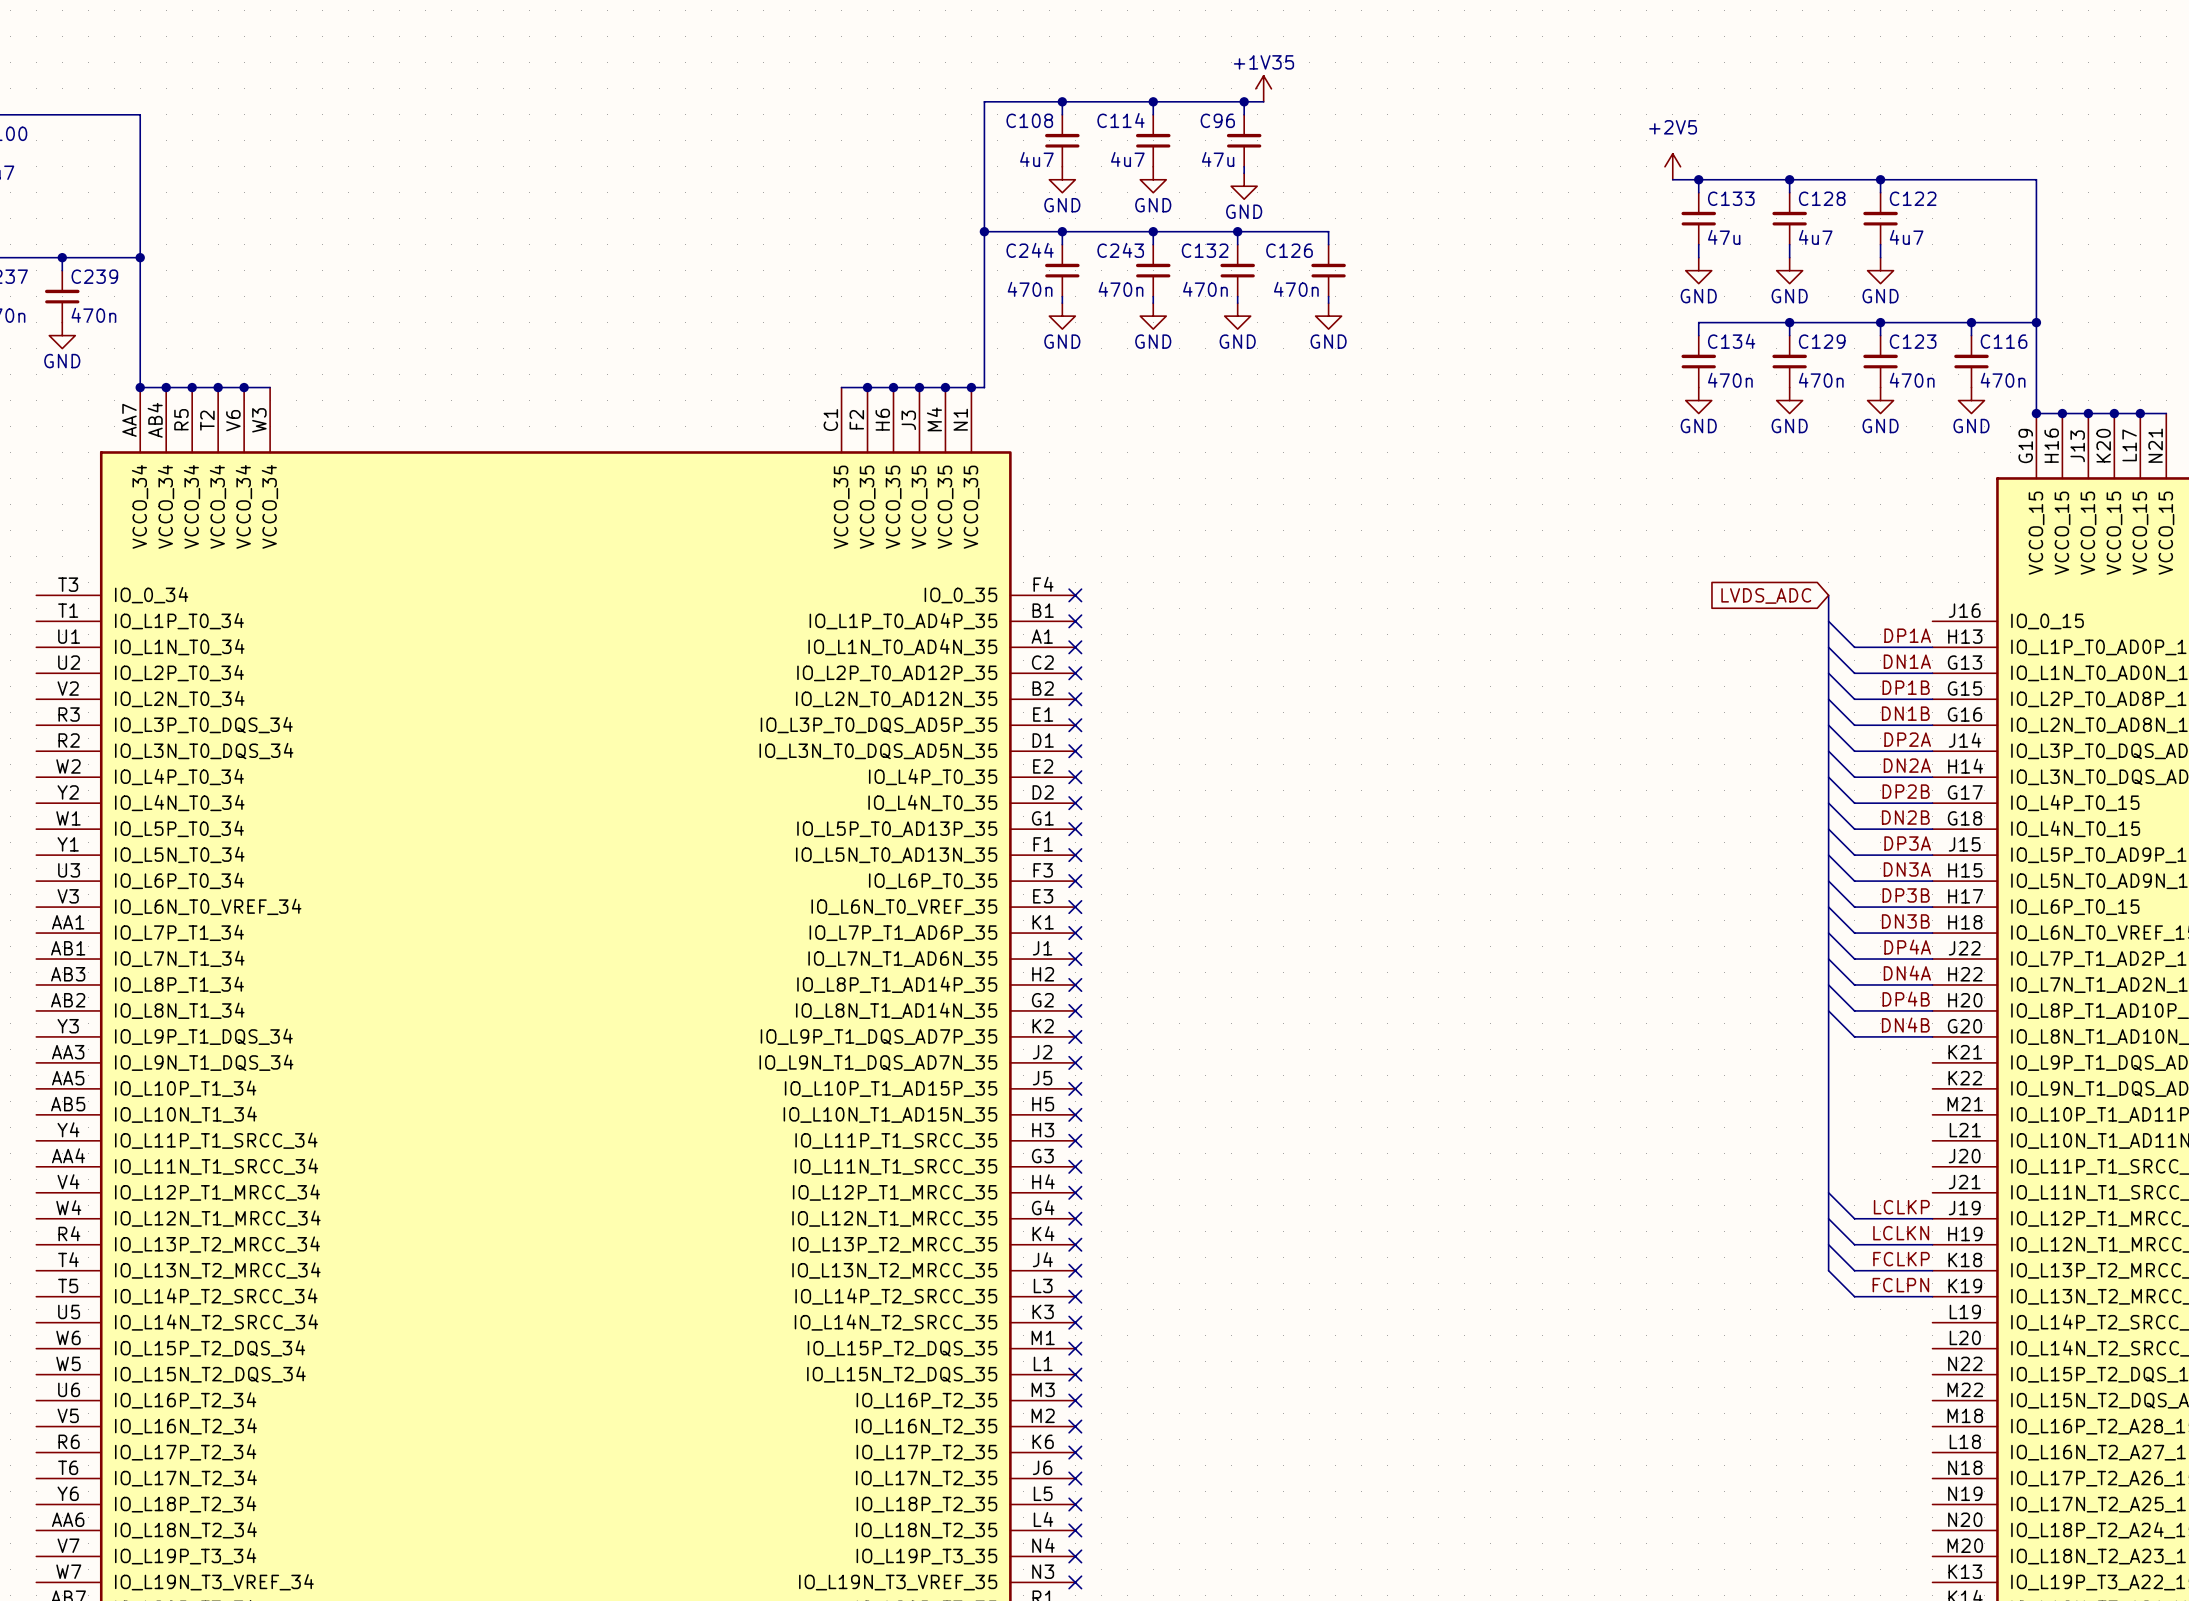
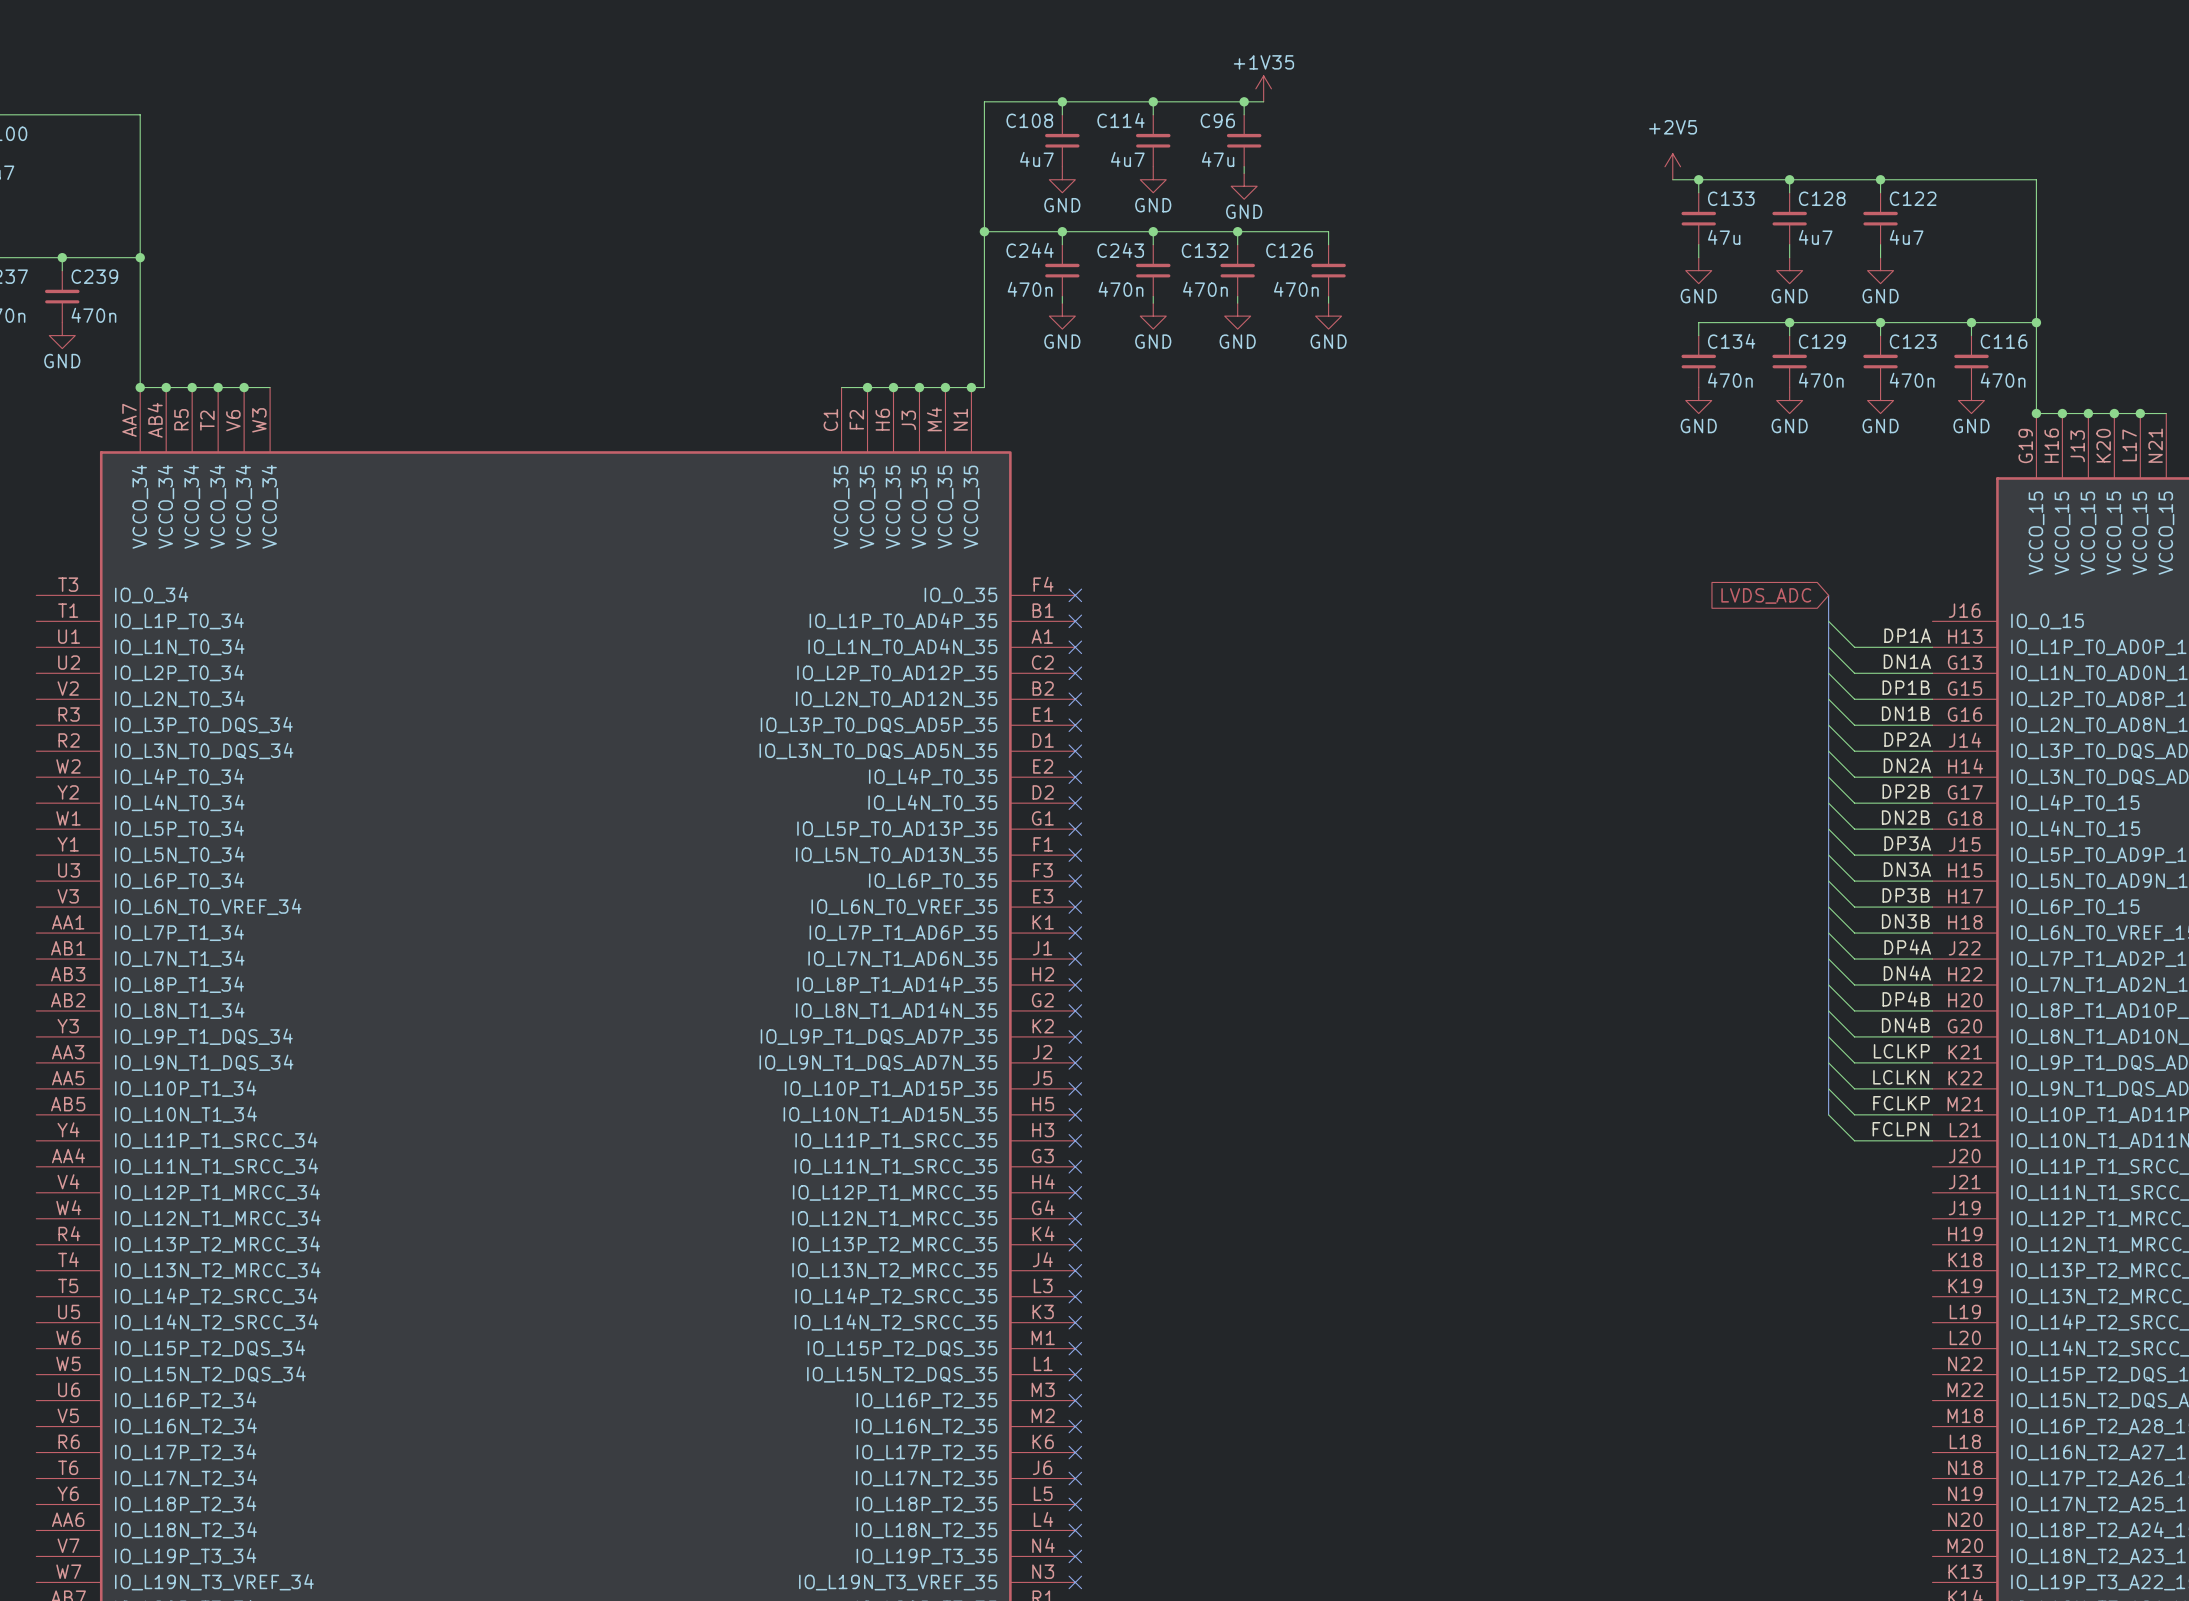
bus: (1828, 1114) (1828, 1270) -> none
wire: (1828, 1192) (1854, 1218) (1932, 1218) -> (1828, 1036) (1854, 1062) (1932, 1062)
label position: LCLKP (1901, 1207) -> LCLKP (1901, 1051)
wire: (1828, 1218) (1854, 1244) (1932, 1244) -> (1828, 1062) (1854, 1088) (1932, 1088)
label position: LCLKN (1901, 1233) -> LCLKN (1901, 1077)
wire: (1828, 1244) (1854, 1270) (1932, 1270) -> (1828, 1088) (1854, 1114) (1932, 1114)
label position: FCLKP (1901, 1259) -> FCLKP (1901, 1103)
wire: (1828, 1270) (1854, 1296) (1932, 1296) -> (1828, 1114) (1854, 1140) (1932, 1140)
label position: FCLPN (1900, 1285) -> FCLPN (1900, 1129)

